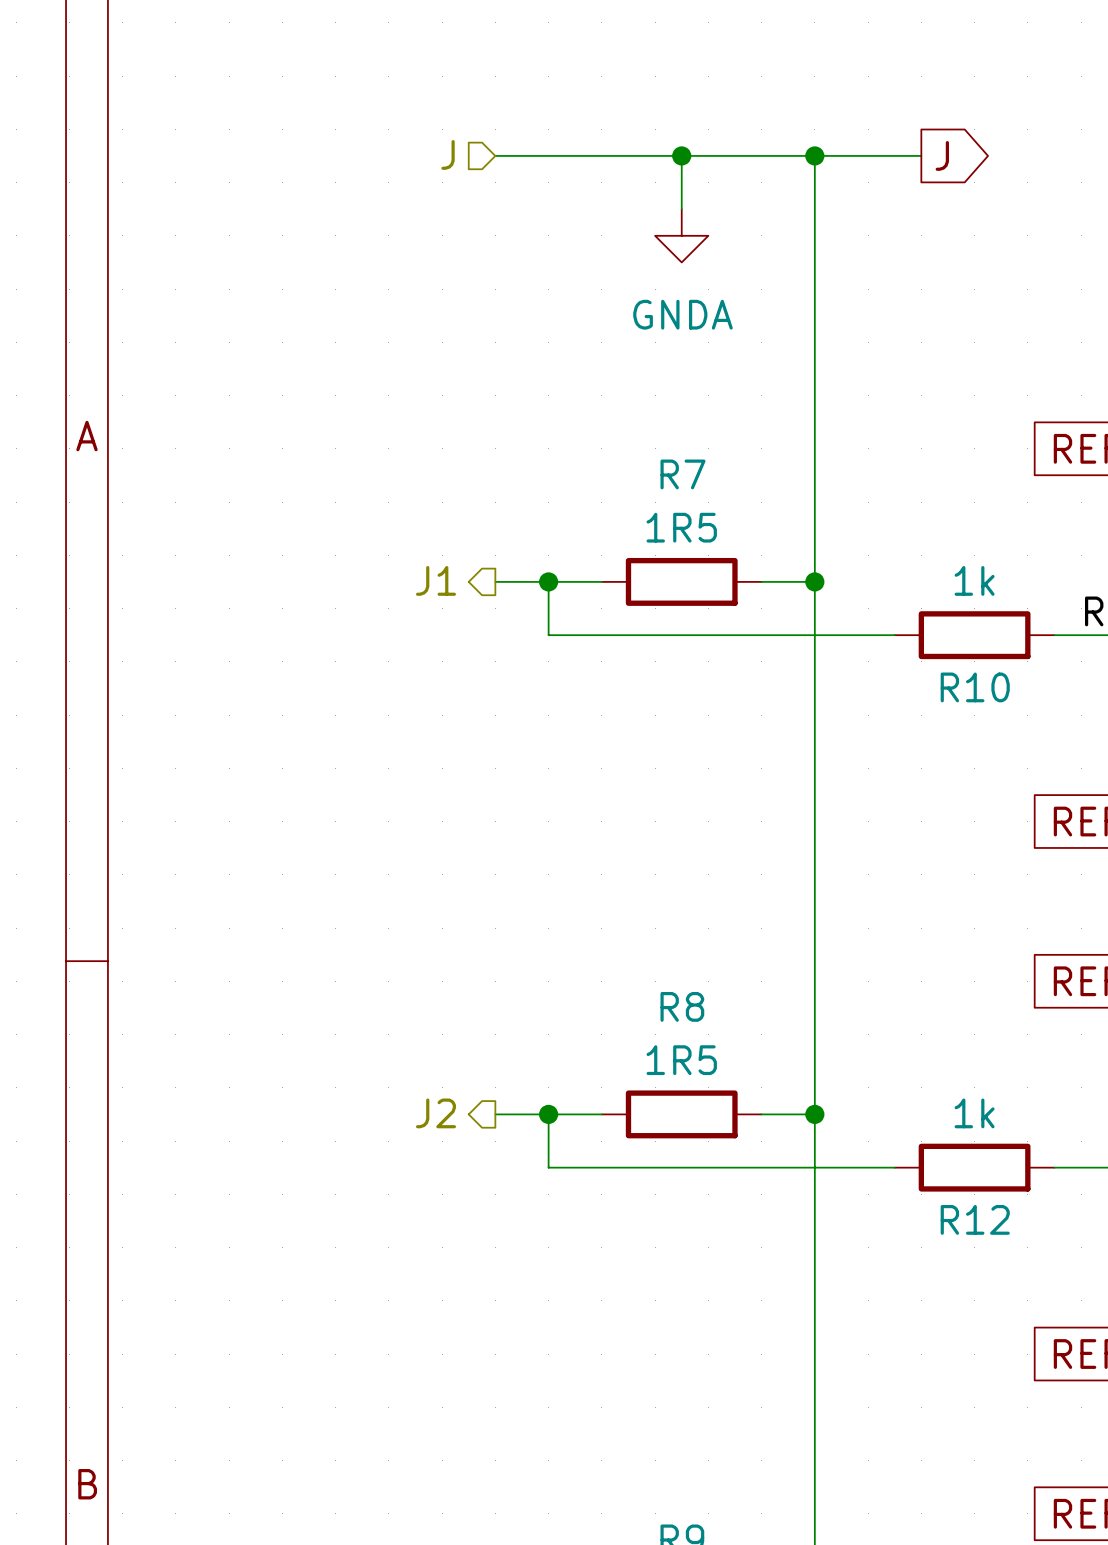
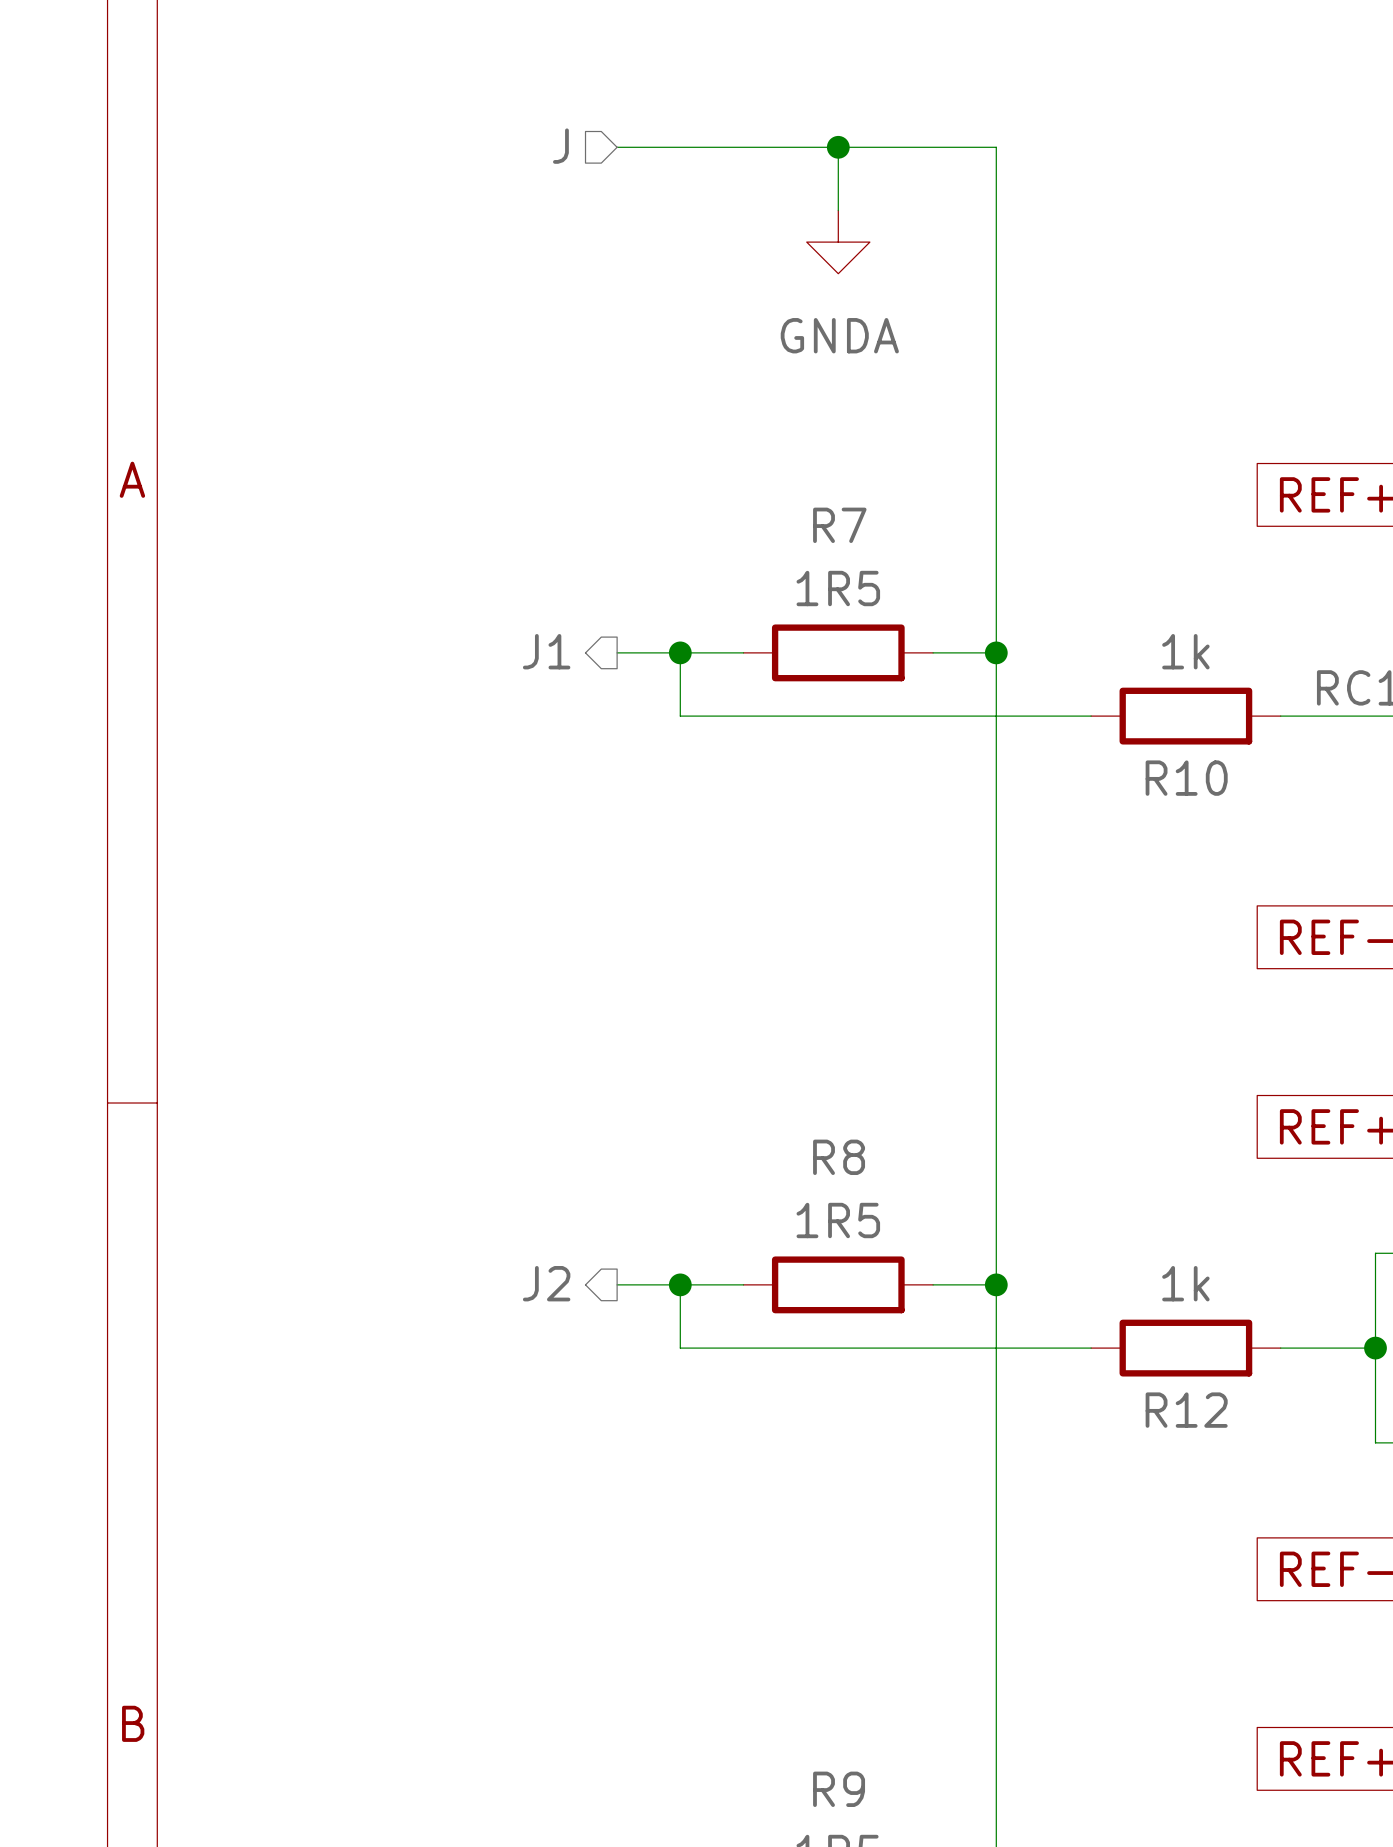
wire: (814, 155) (921, 155) -> none
junction: (814, 155) -> none
global label: J (942, 155) -> none

